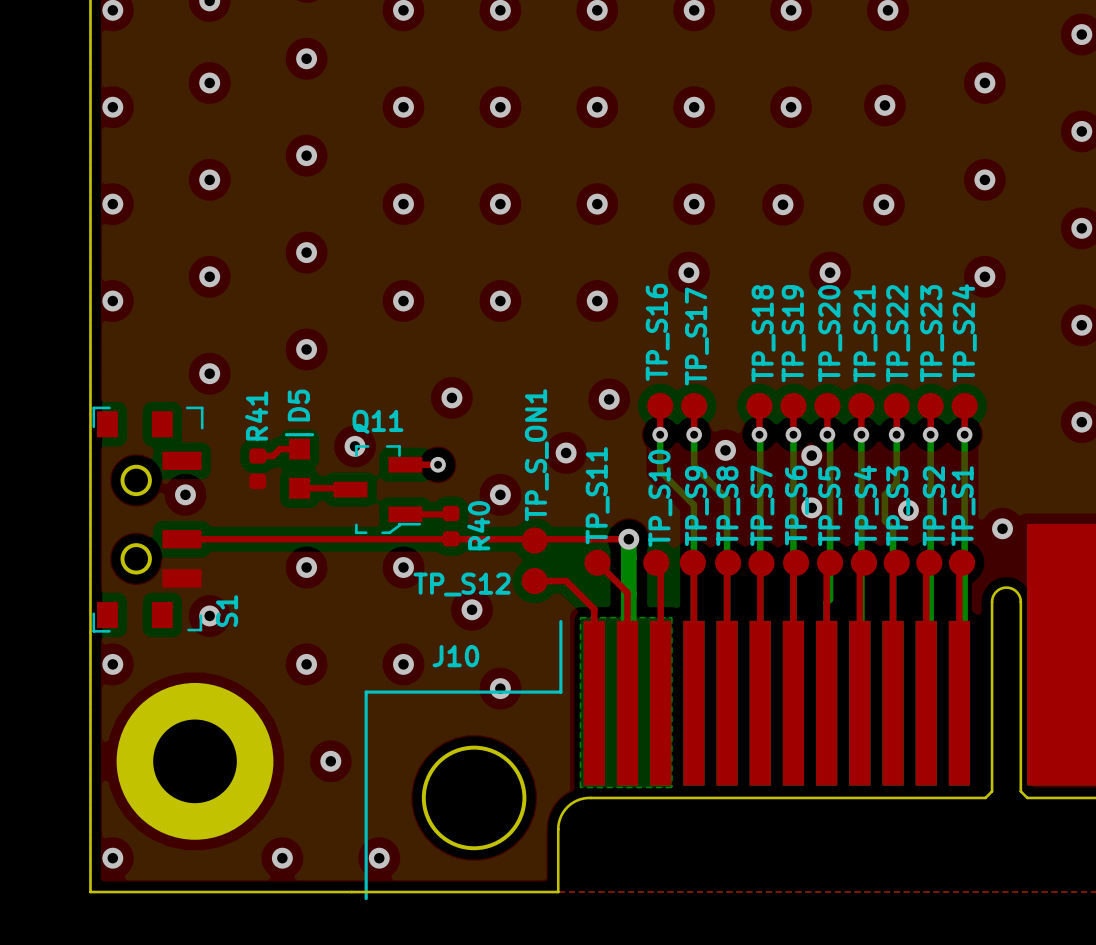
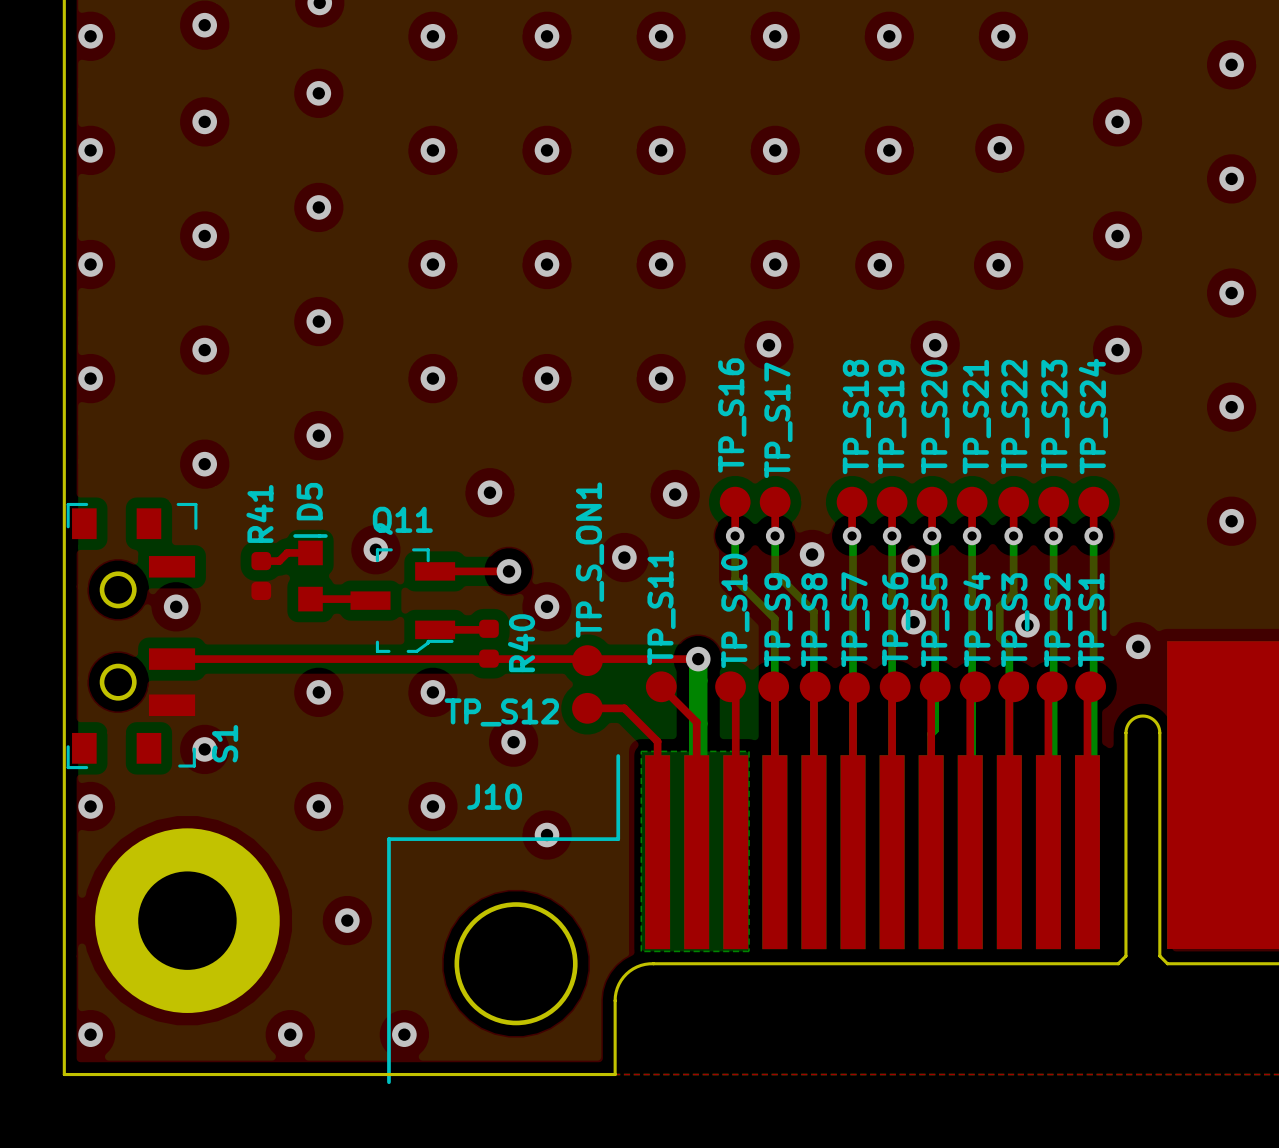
top track: none -> (473, 571) (508, 571)
via: (438, 464) -> none
via: none -> (508, 571)

